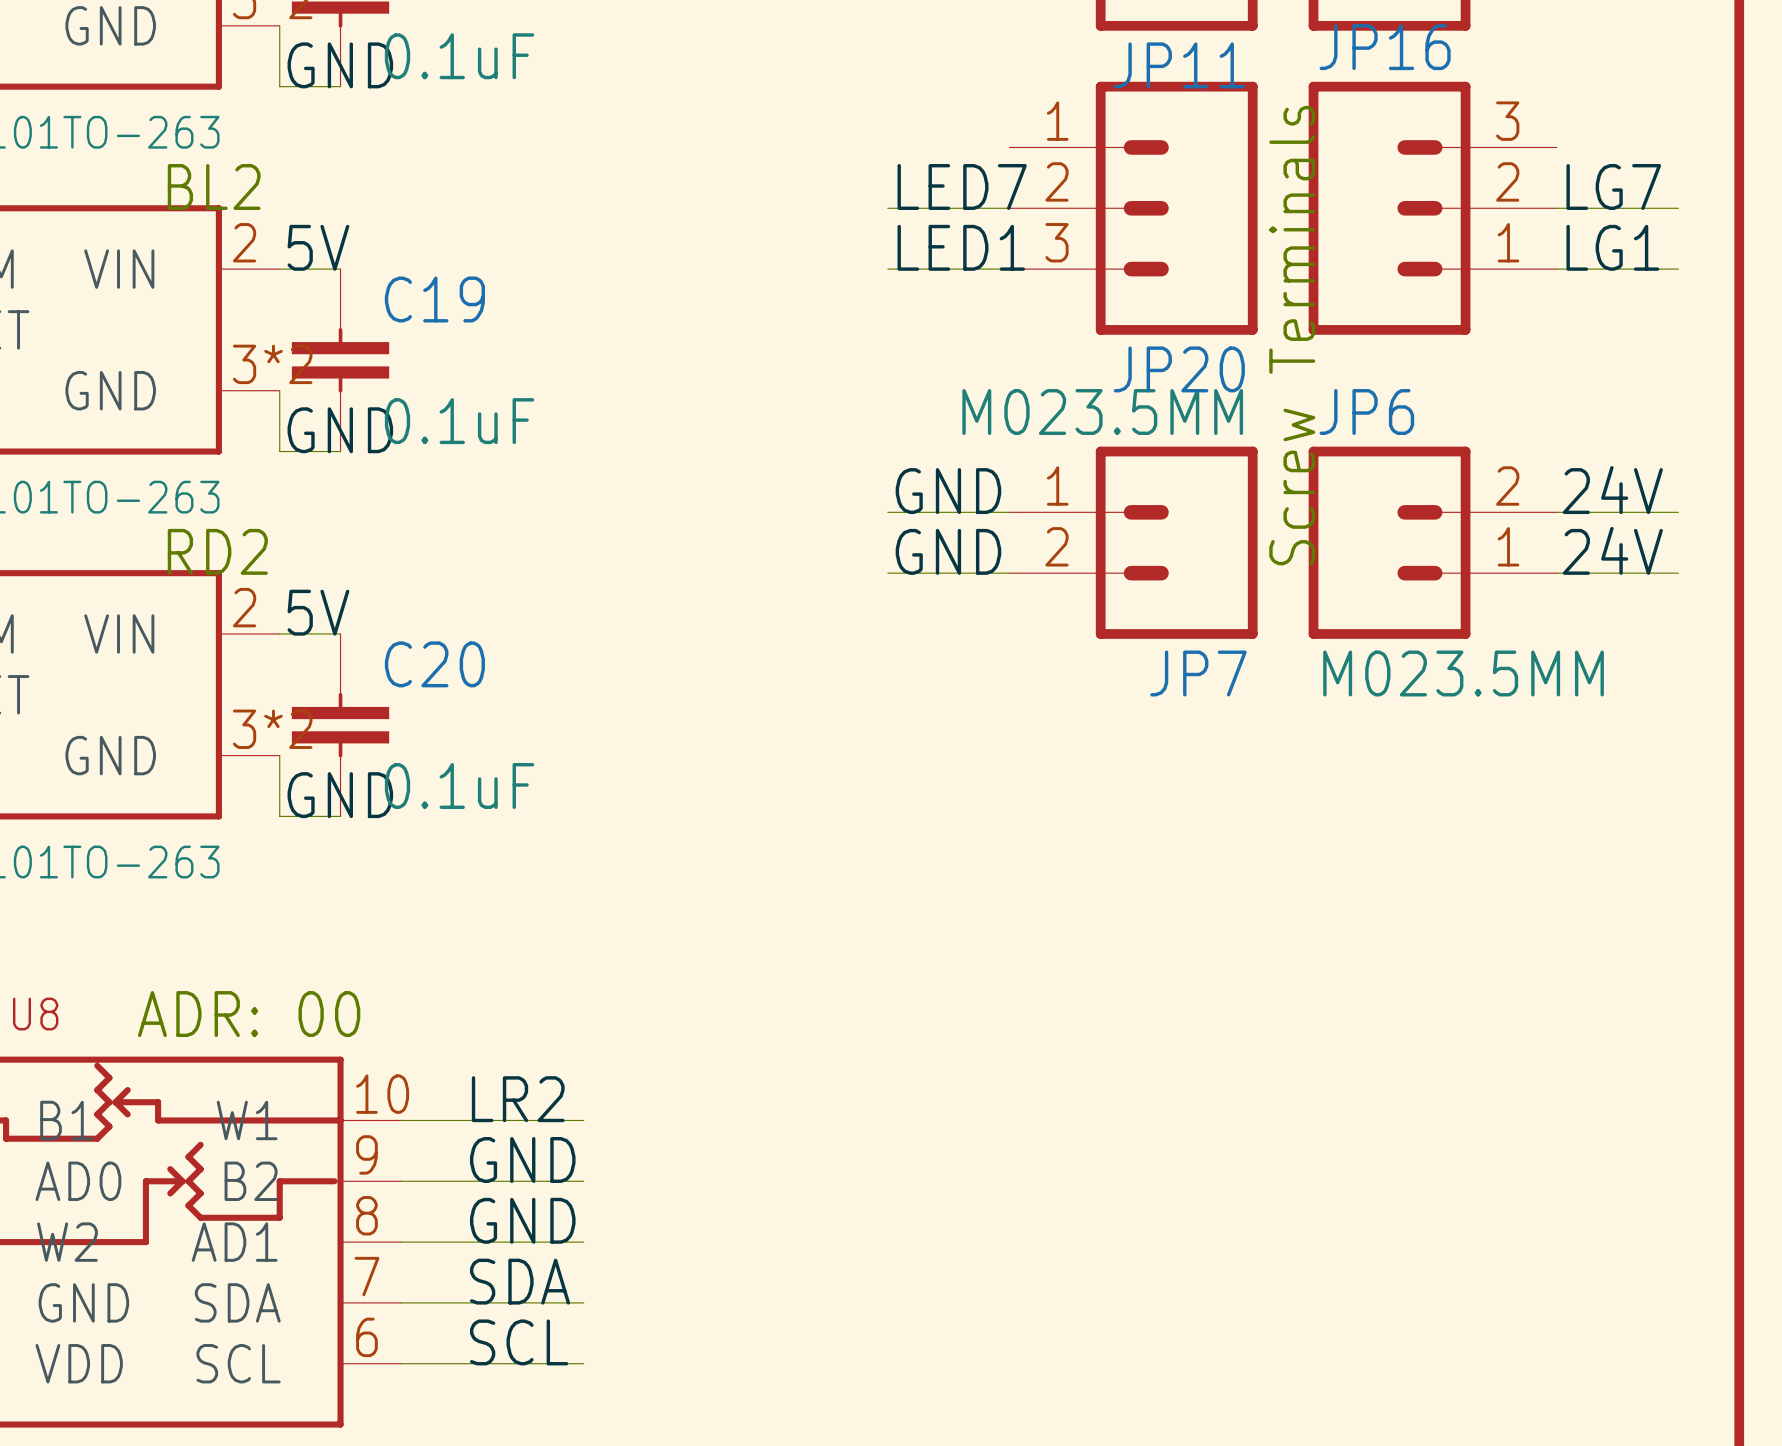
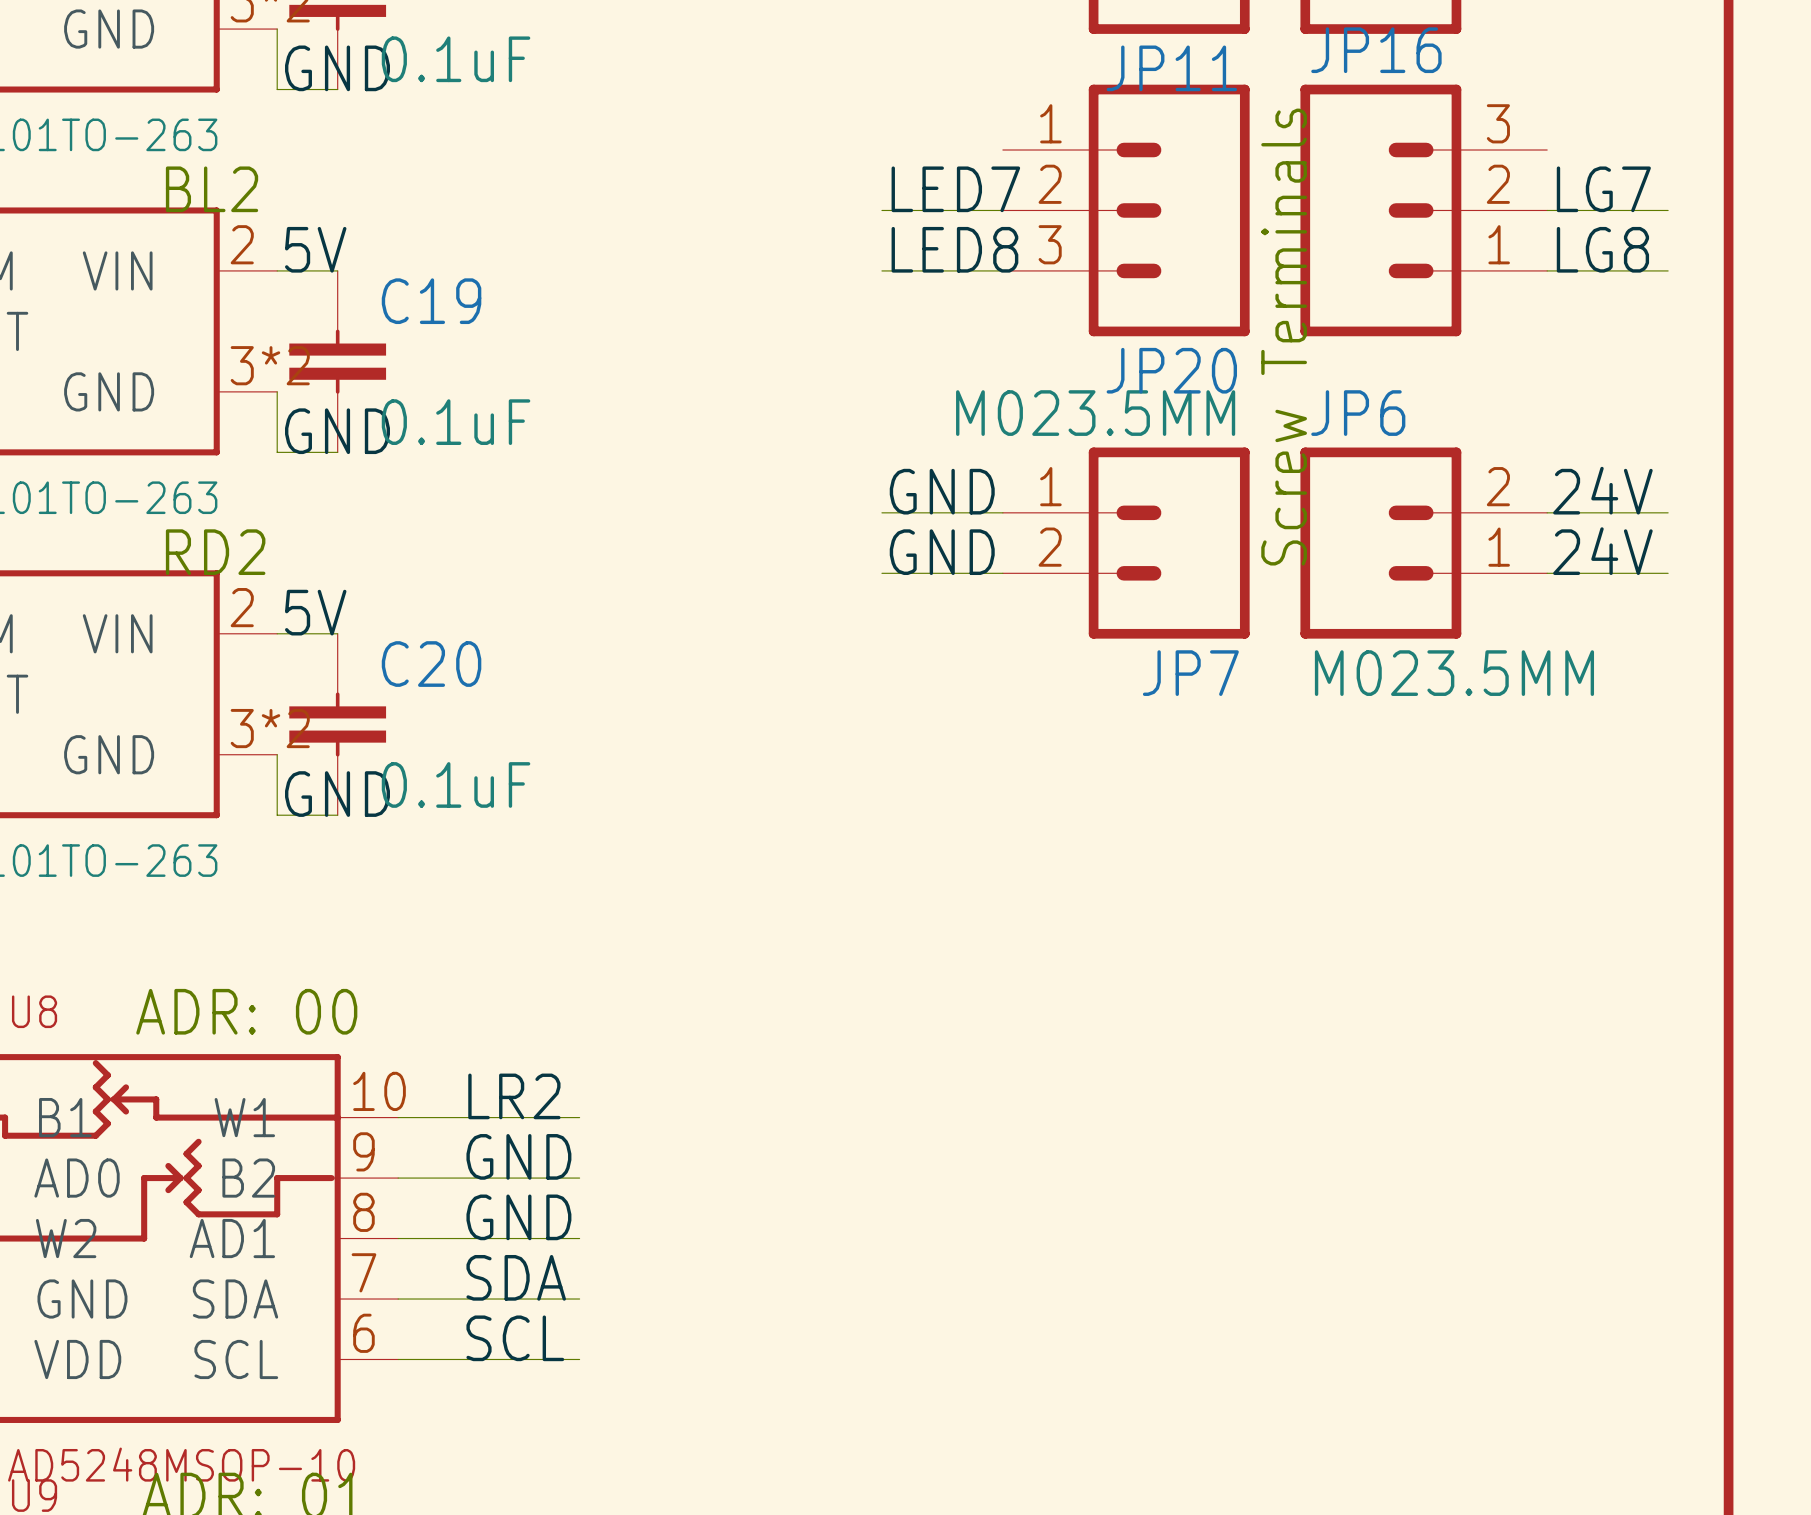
label: LED1 (961, 247) -> LED8 (954, 249)
label: LG1 (1612, 247) -> LG8 (1602, 249)

